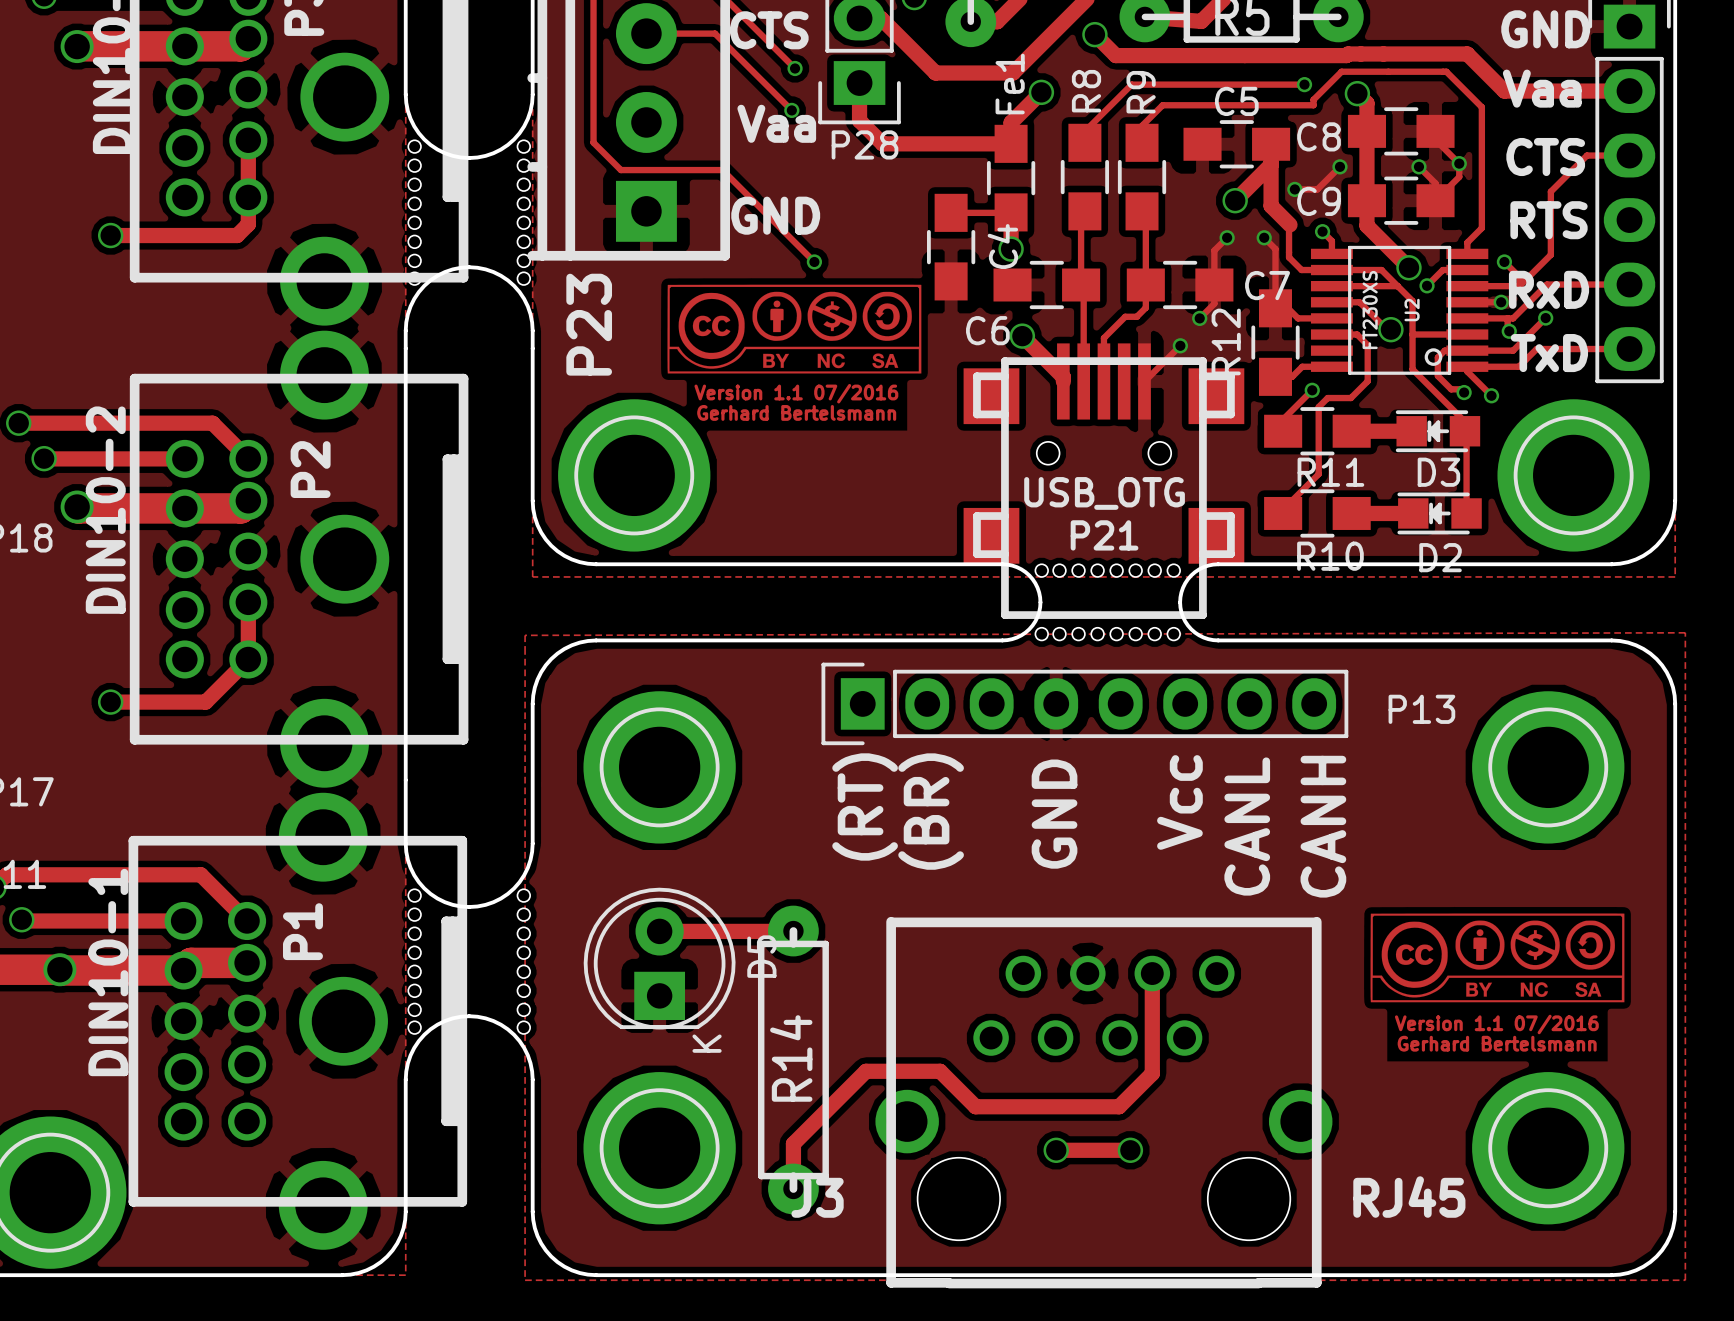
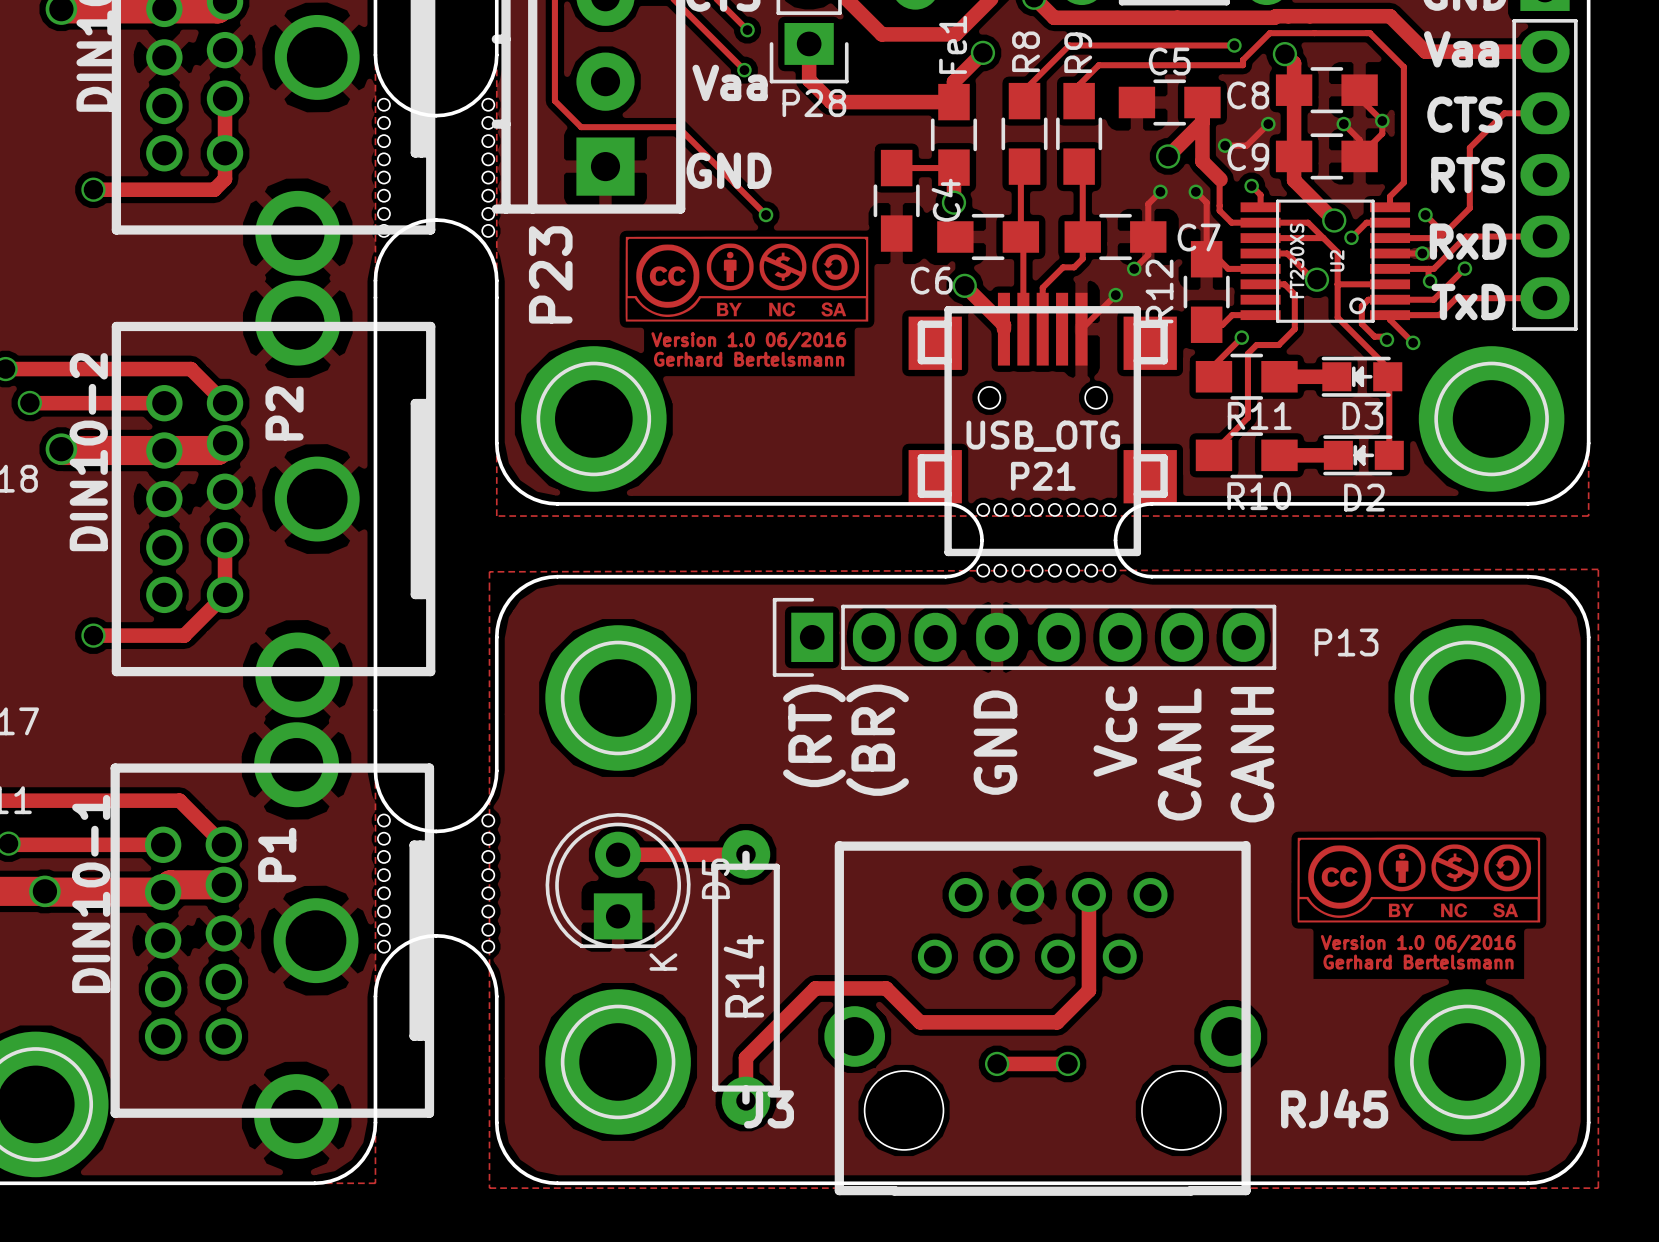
text: Version 1.1 07/2016 (796, 393) -> Version 1.0 06/2016 (748, 340)
text: Version 1.1 07/2016 (1496, 1024) -> Version 1.0 06/2016 (1418, 943)

